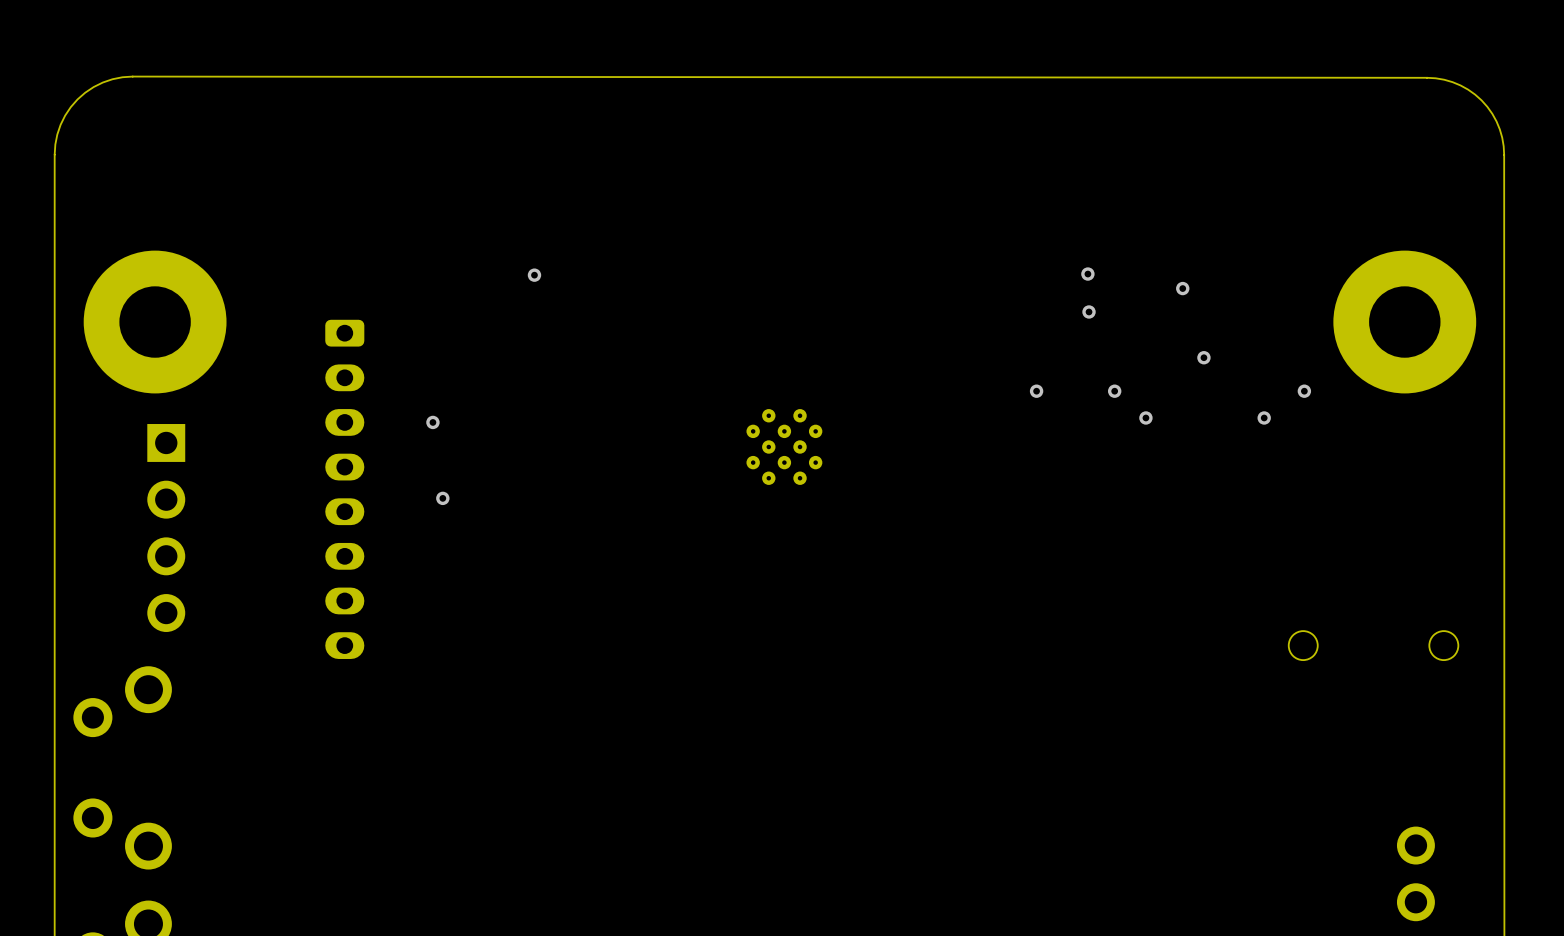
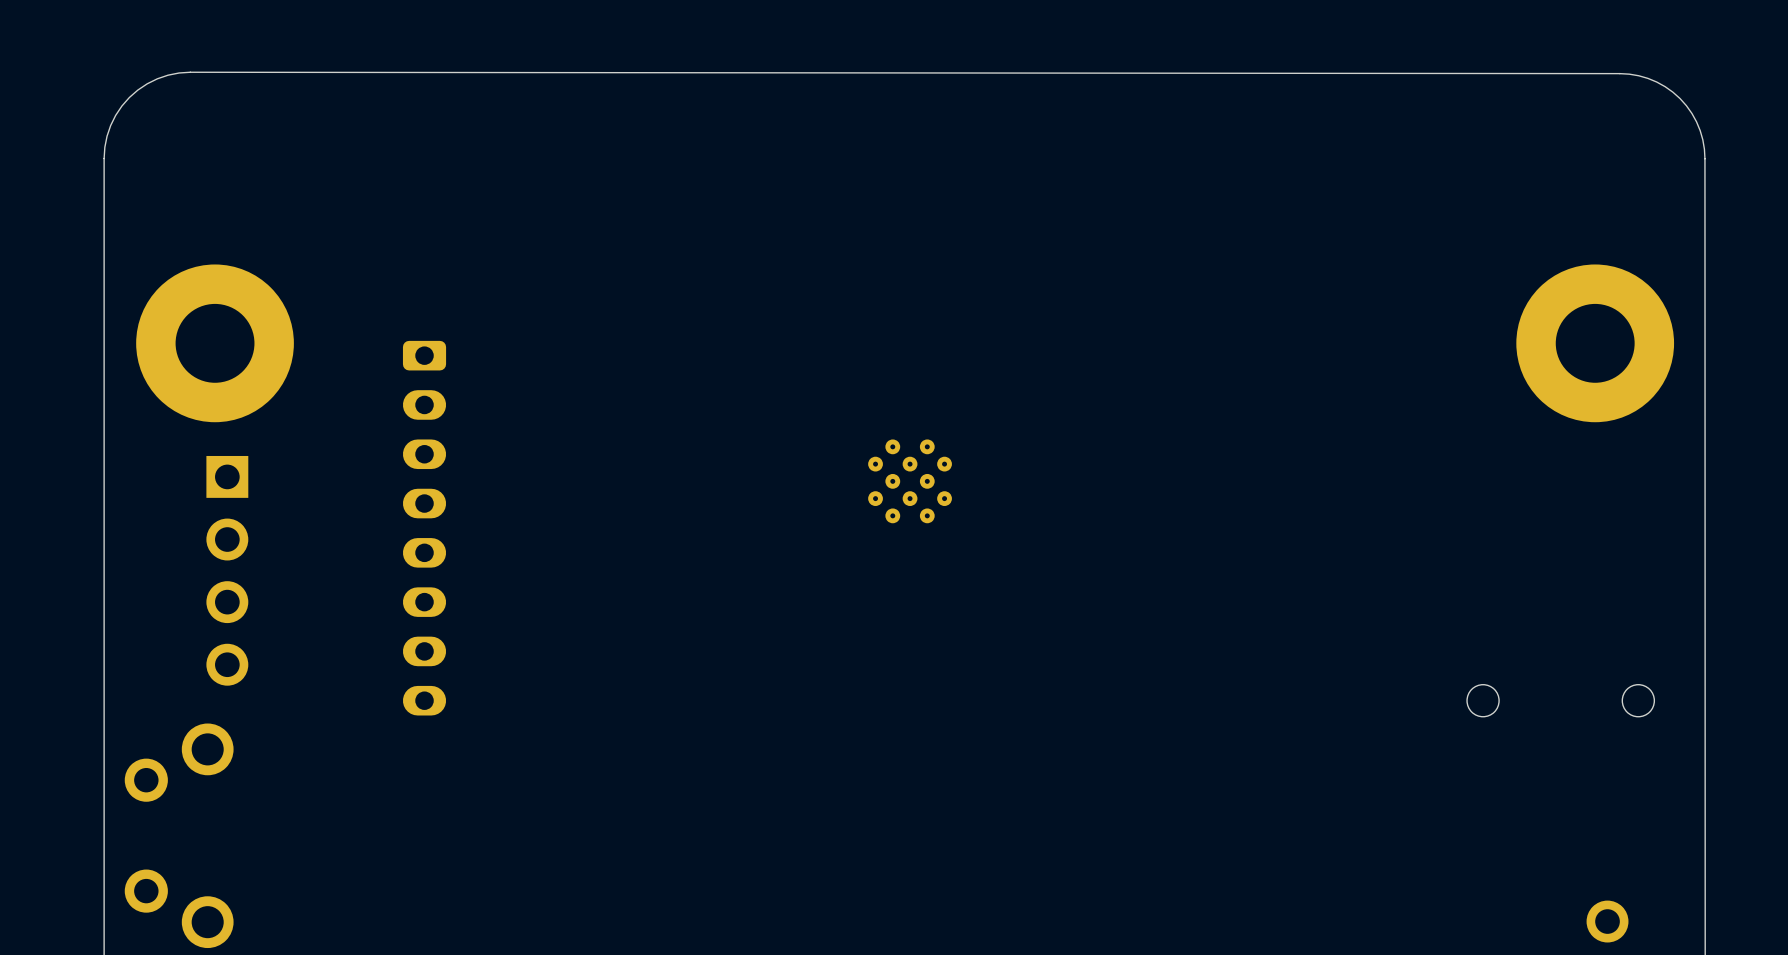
via: (1087, 274) -> none
via: (534, 275) -> none
via: (1182, 288) -> none
via: (1089, 311) -> none
via: (1203, 357) -> none
via: (1036, 391) -> none
via: (1114, 391) -> none
via: (1304, 391) -> none
via: (1145, 417) -> none
via: (1264, 417) -> none
via: (432, 422) -> none
via: (442, 498) -> none

